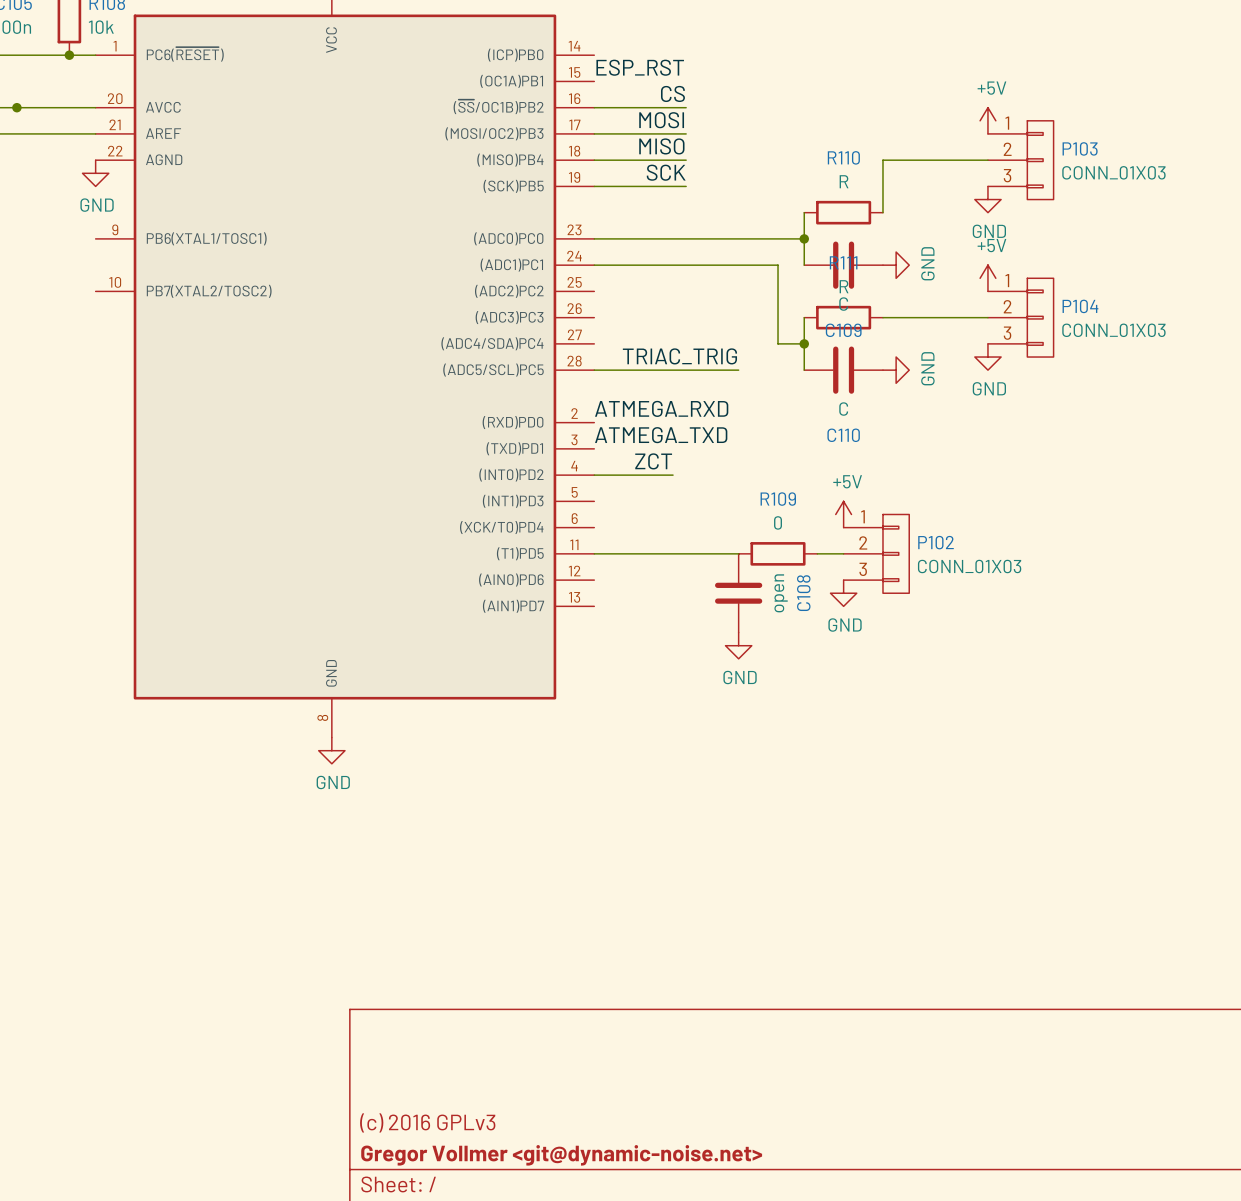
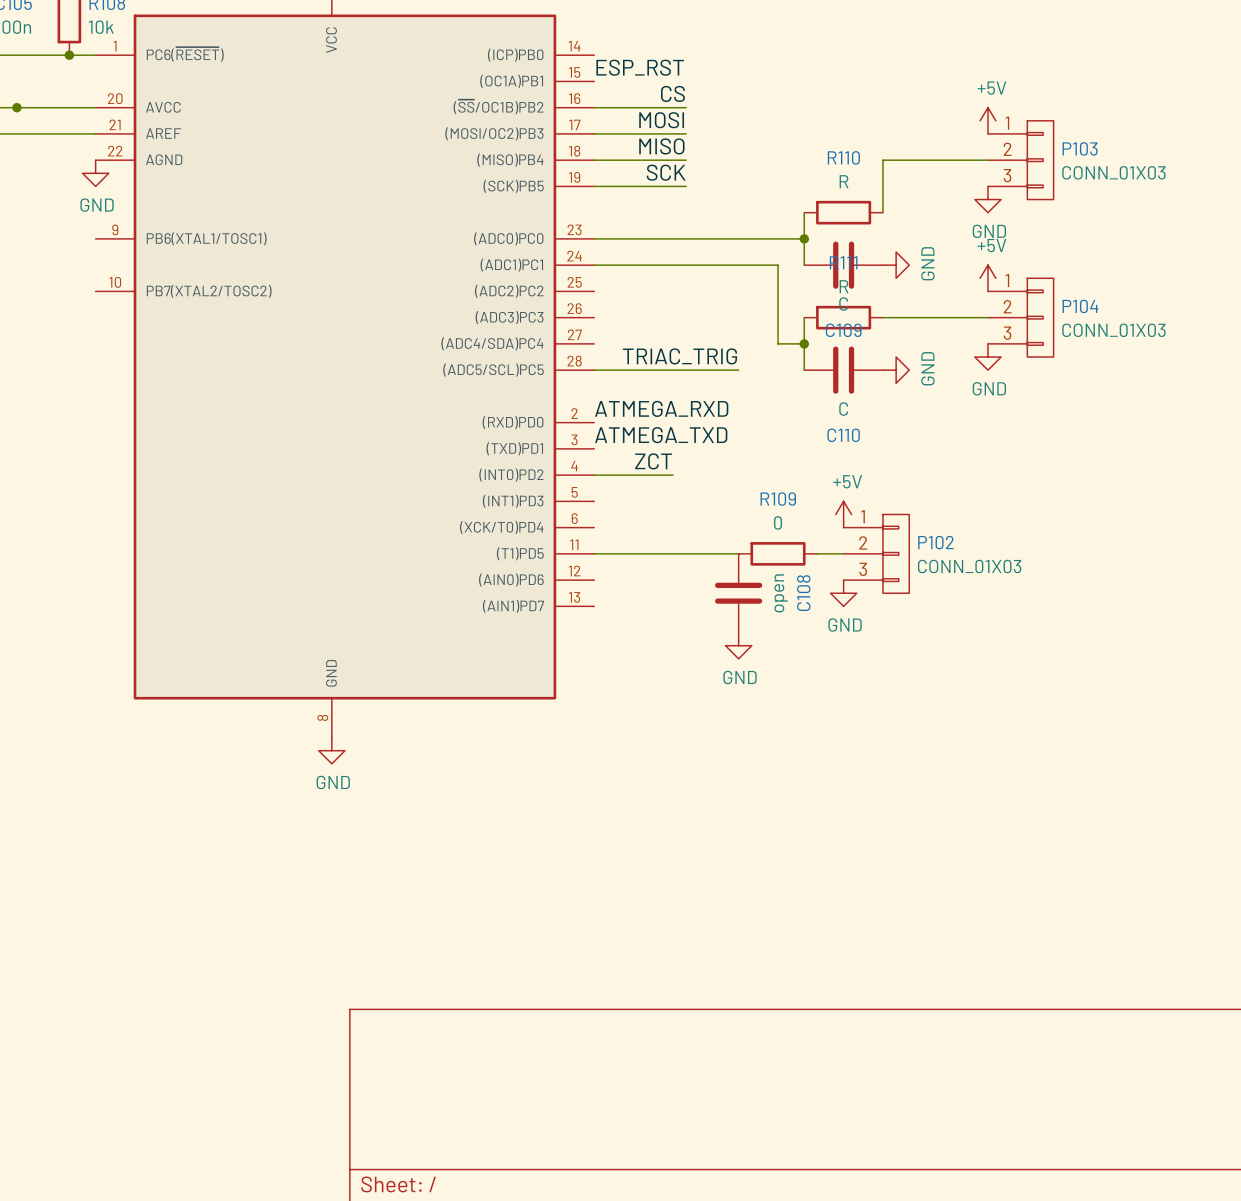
title block: (c) 2016 GPLv3 (427, 1122) -> none
title block: Gregor Vollmer <git@dynamic-noise.net> (561, 1155) -> none

